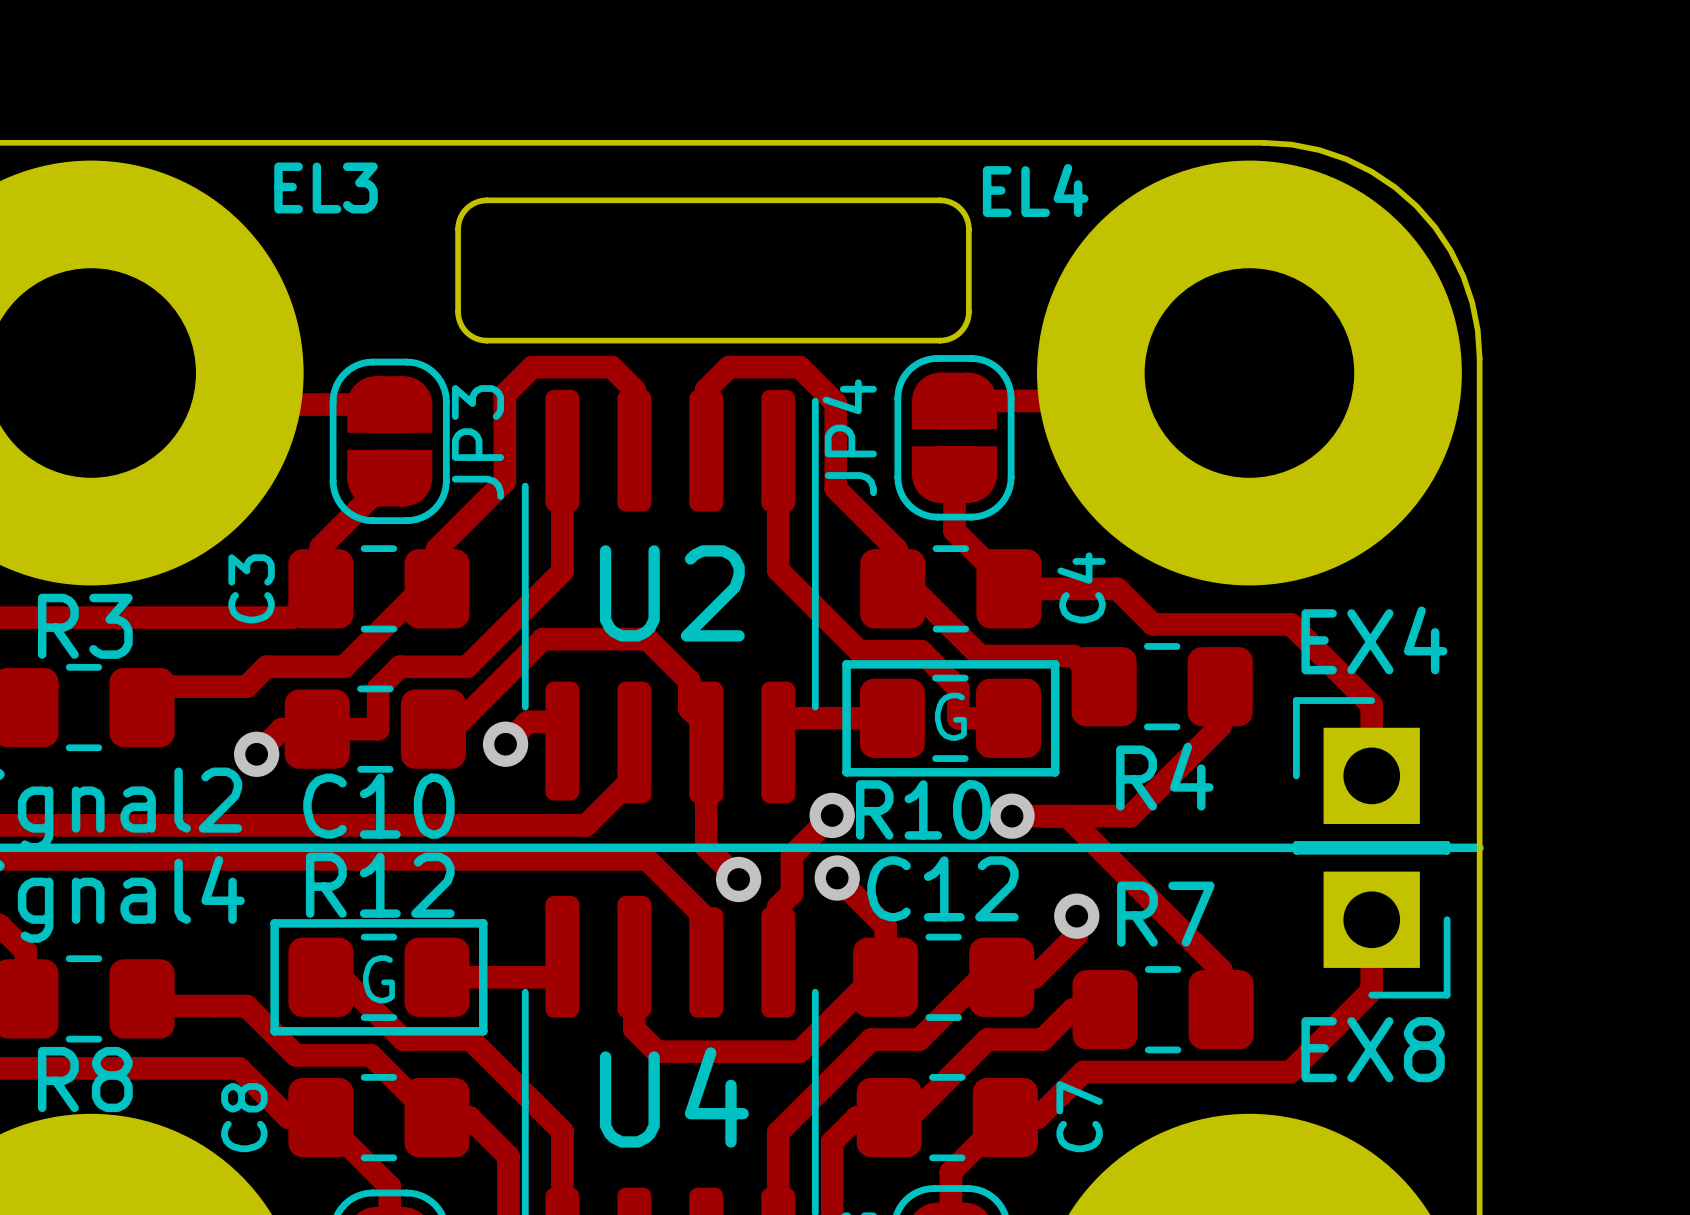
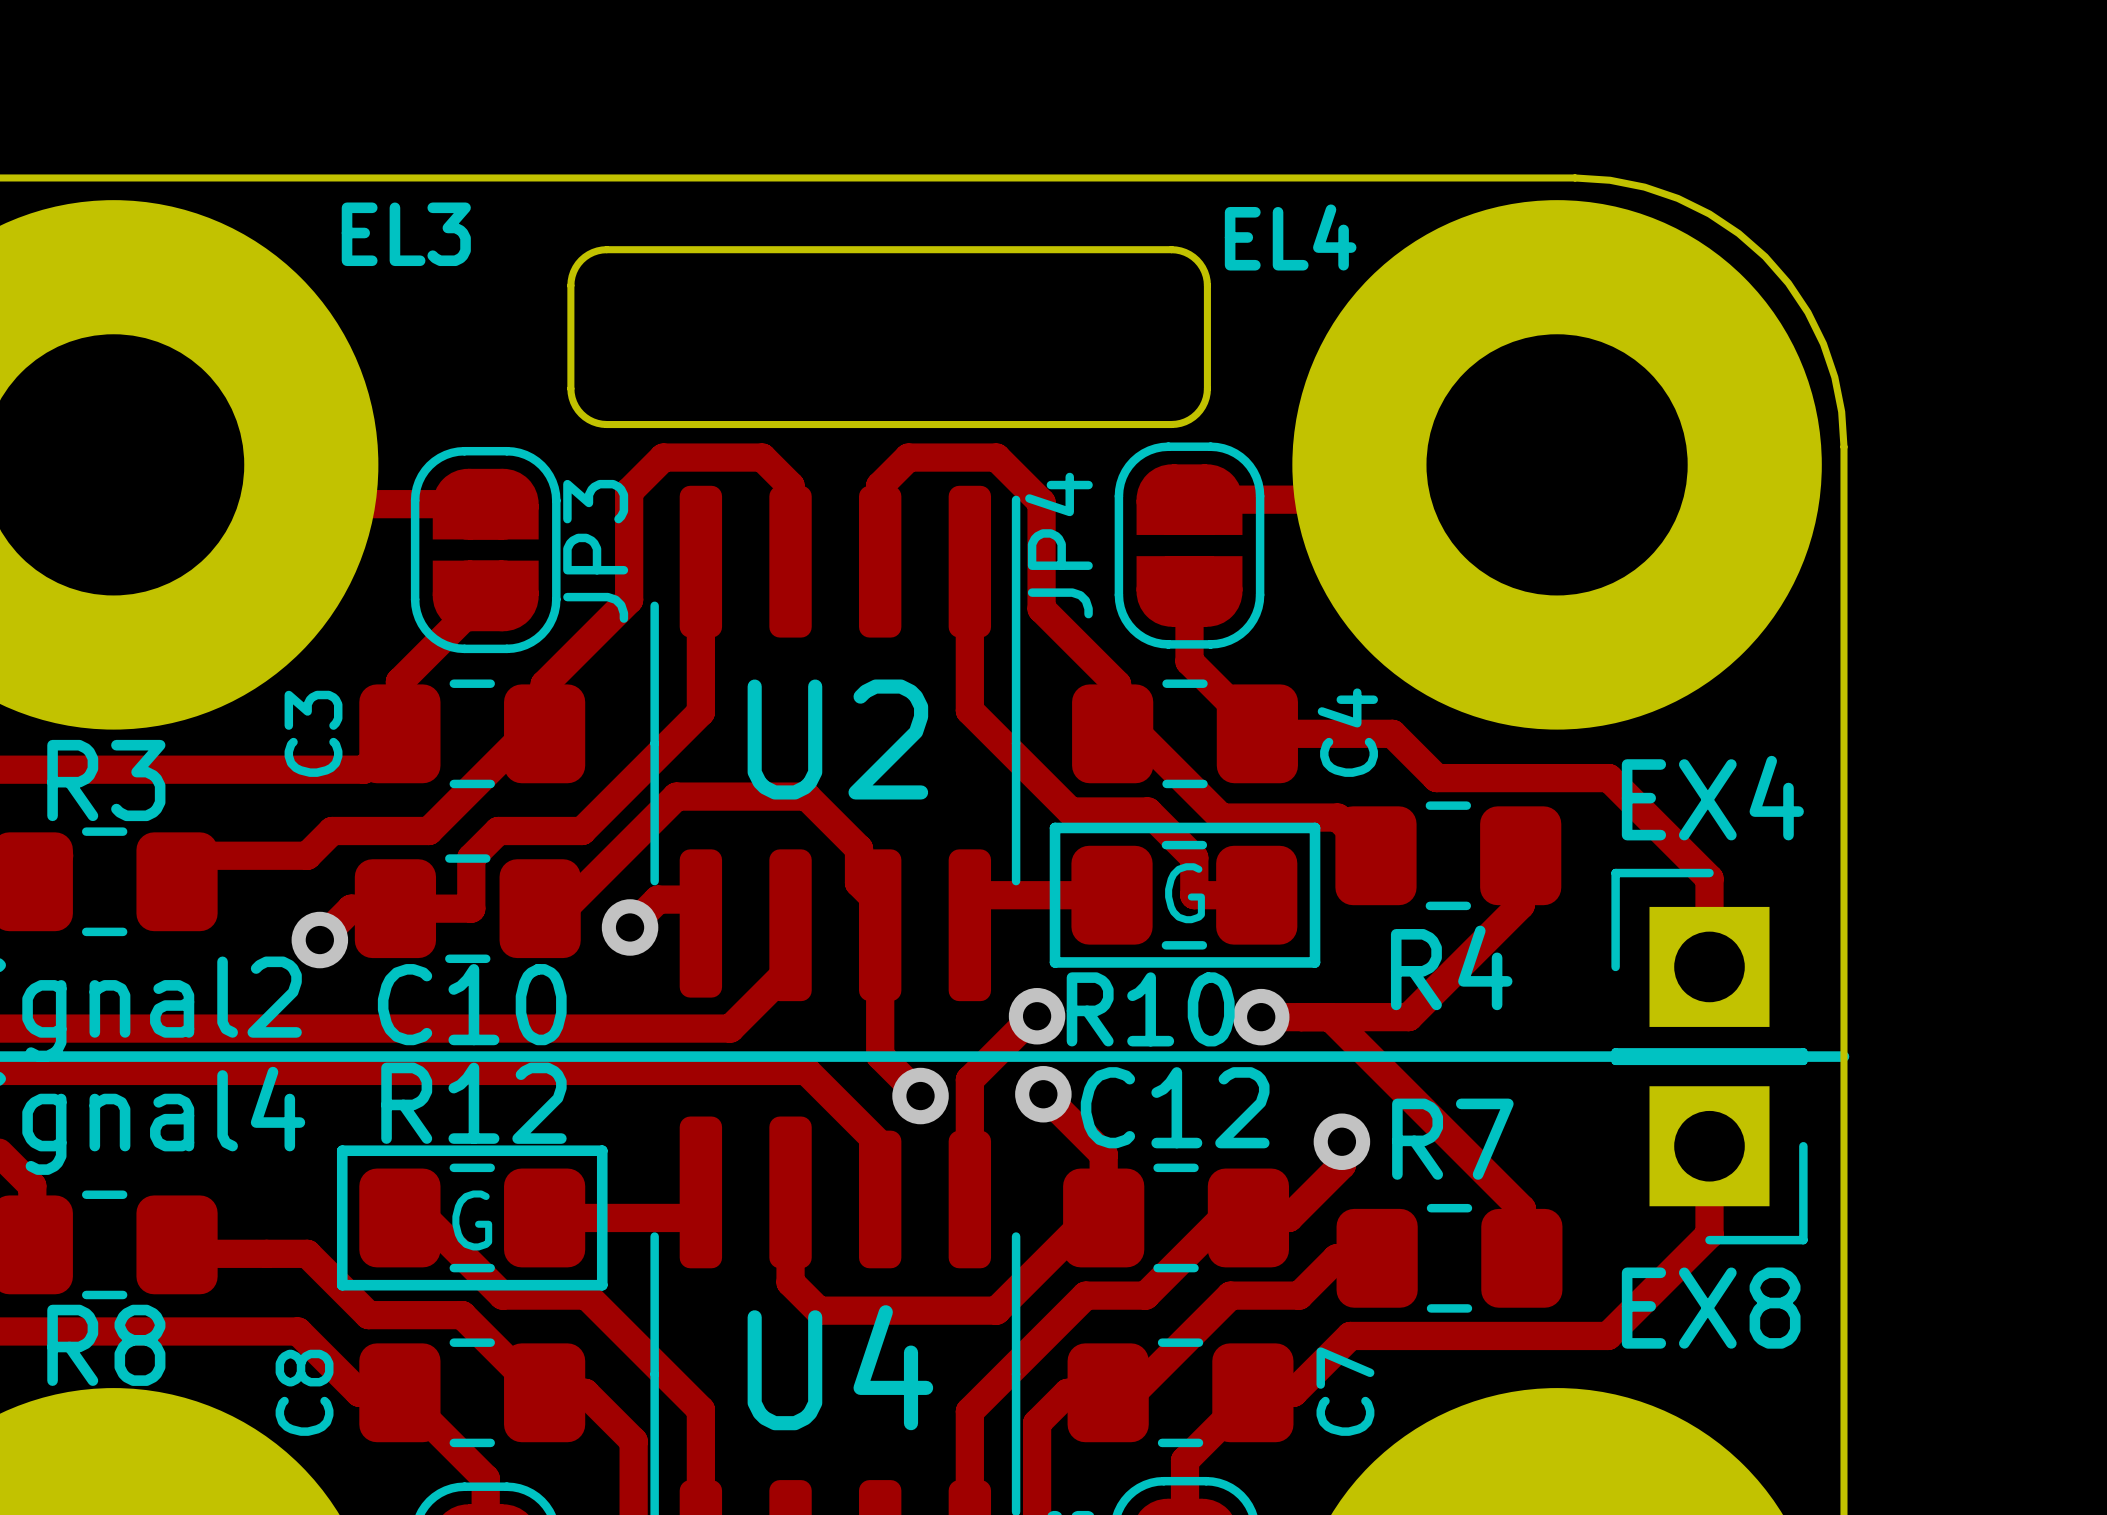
track: (832, 815) (791, 855) (791, 893) (778, 906) -> (1032, 1017) (969, 1079) (969, 1130)

